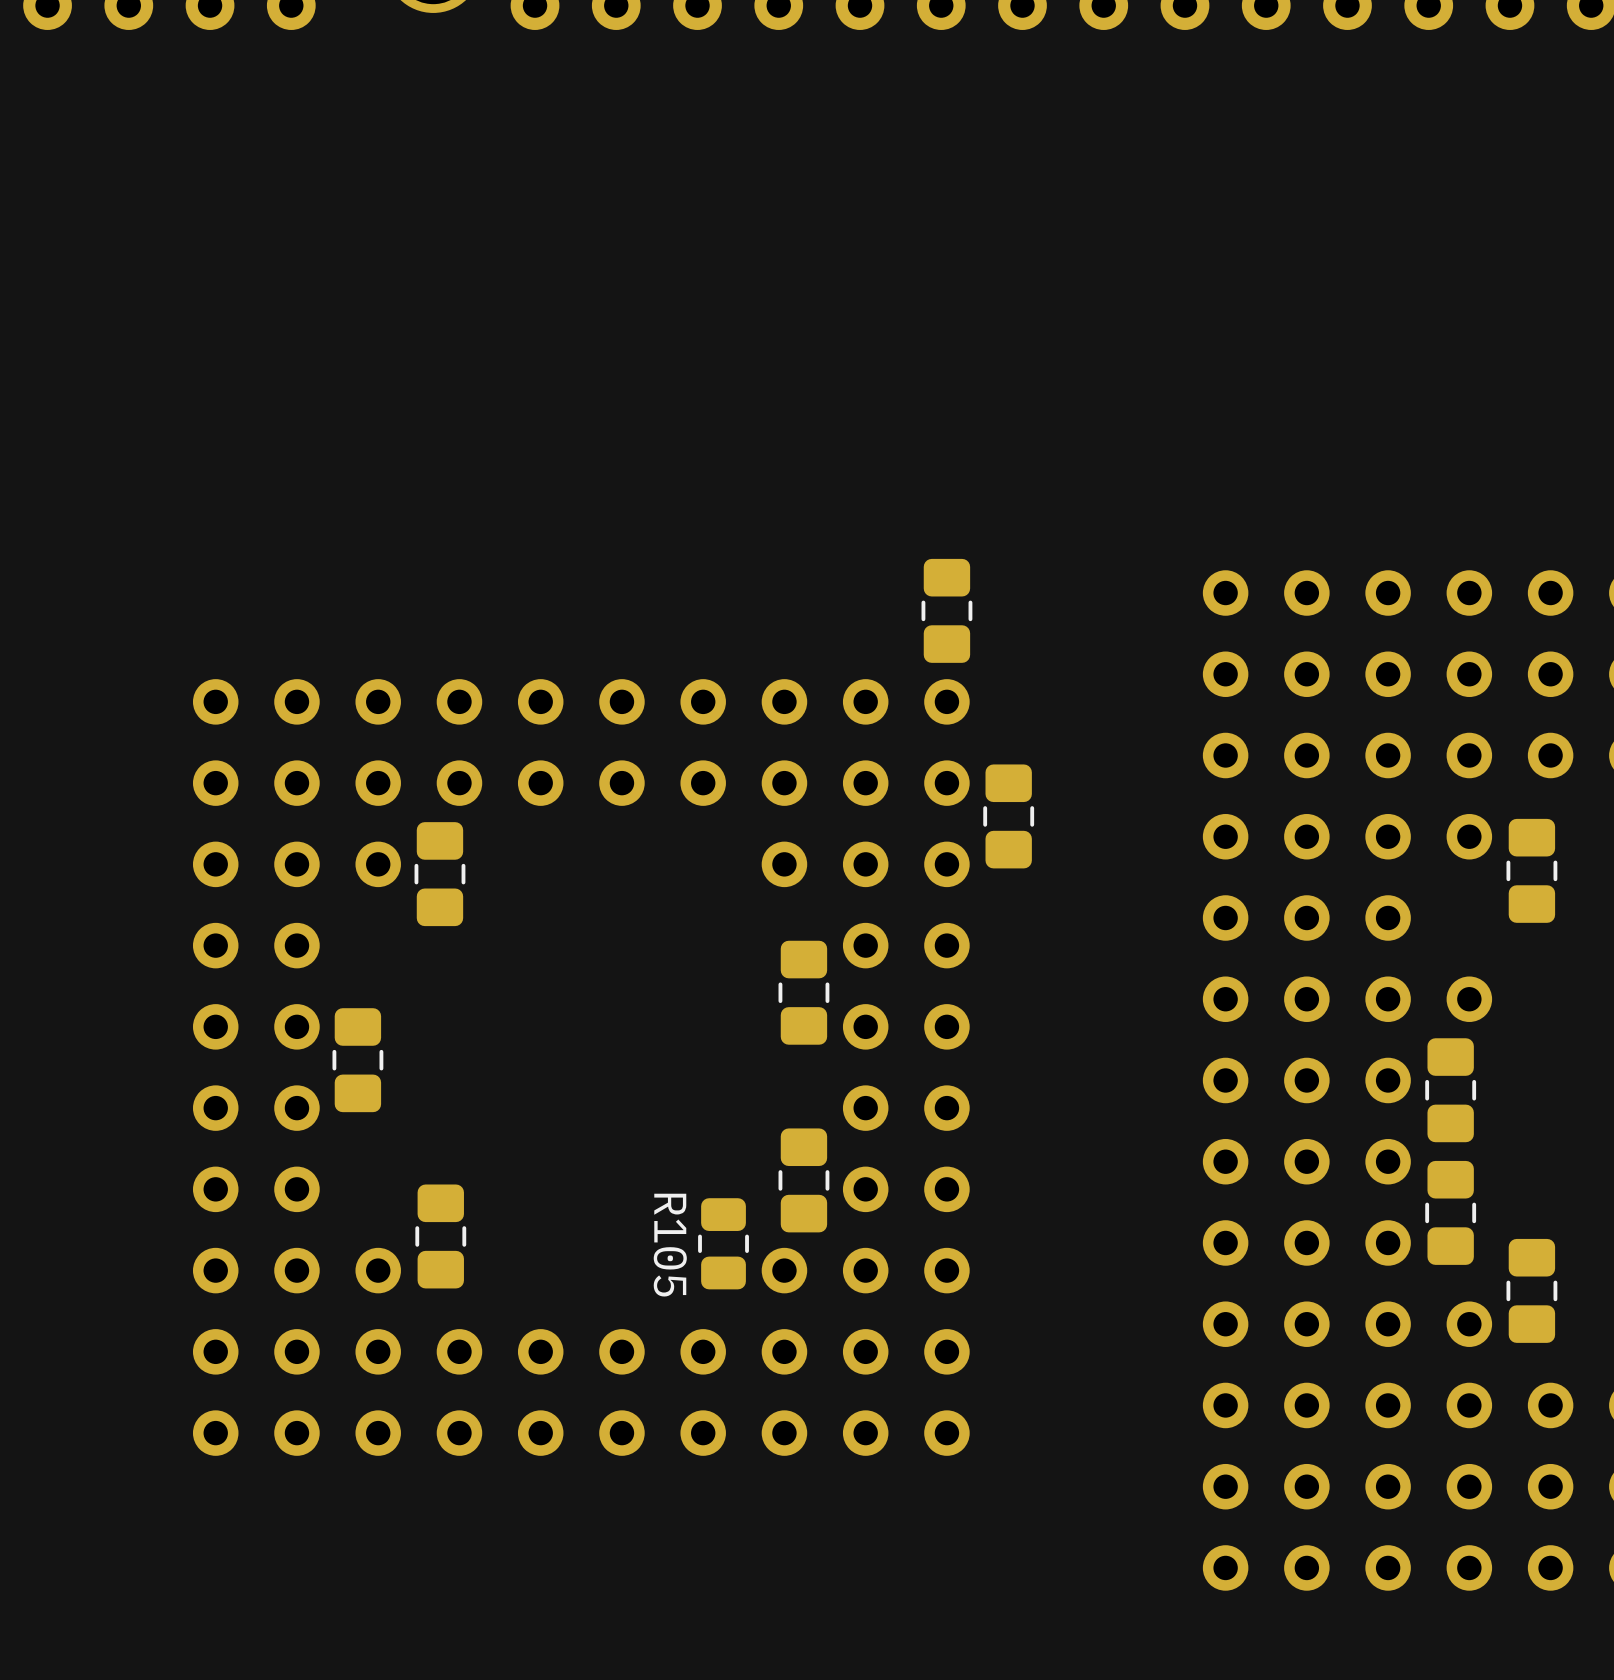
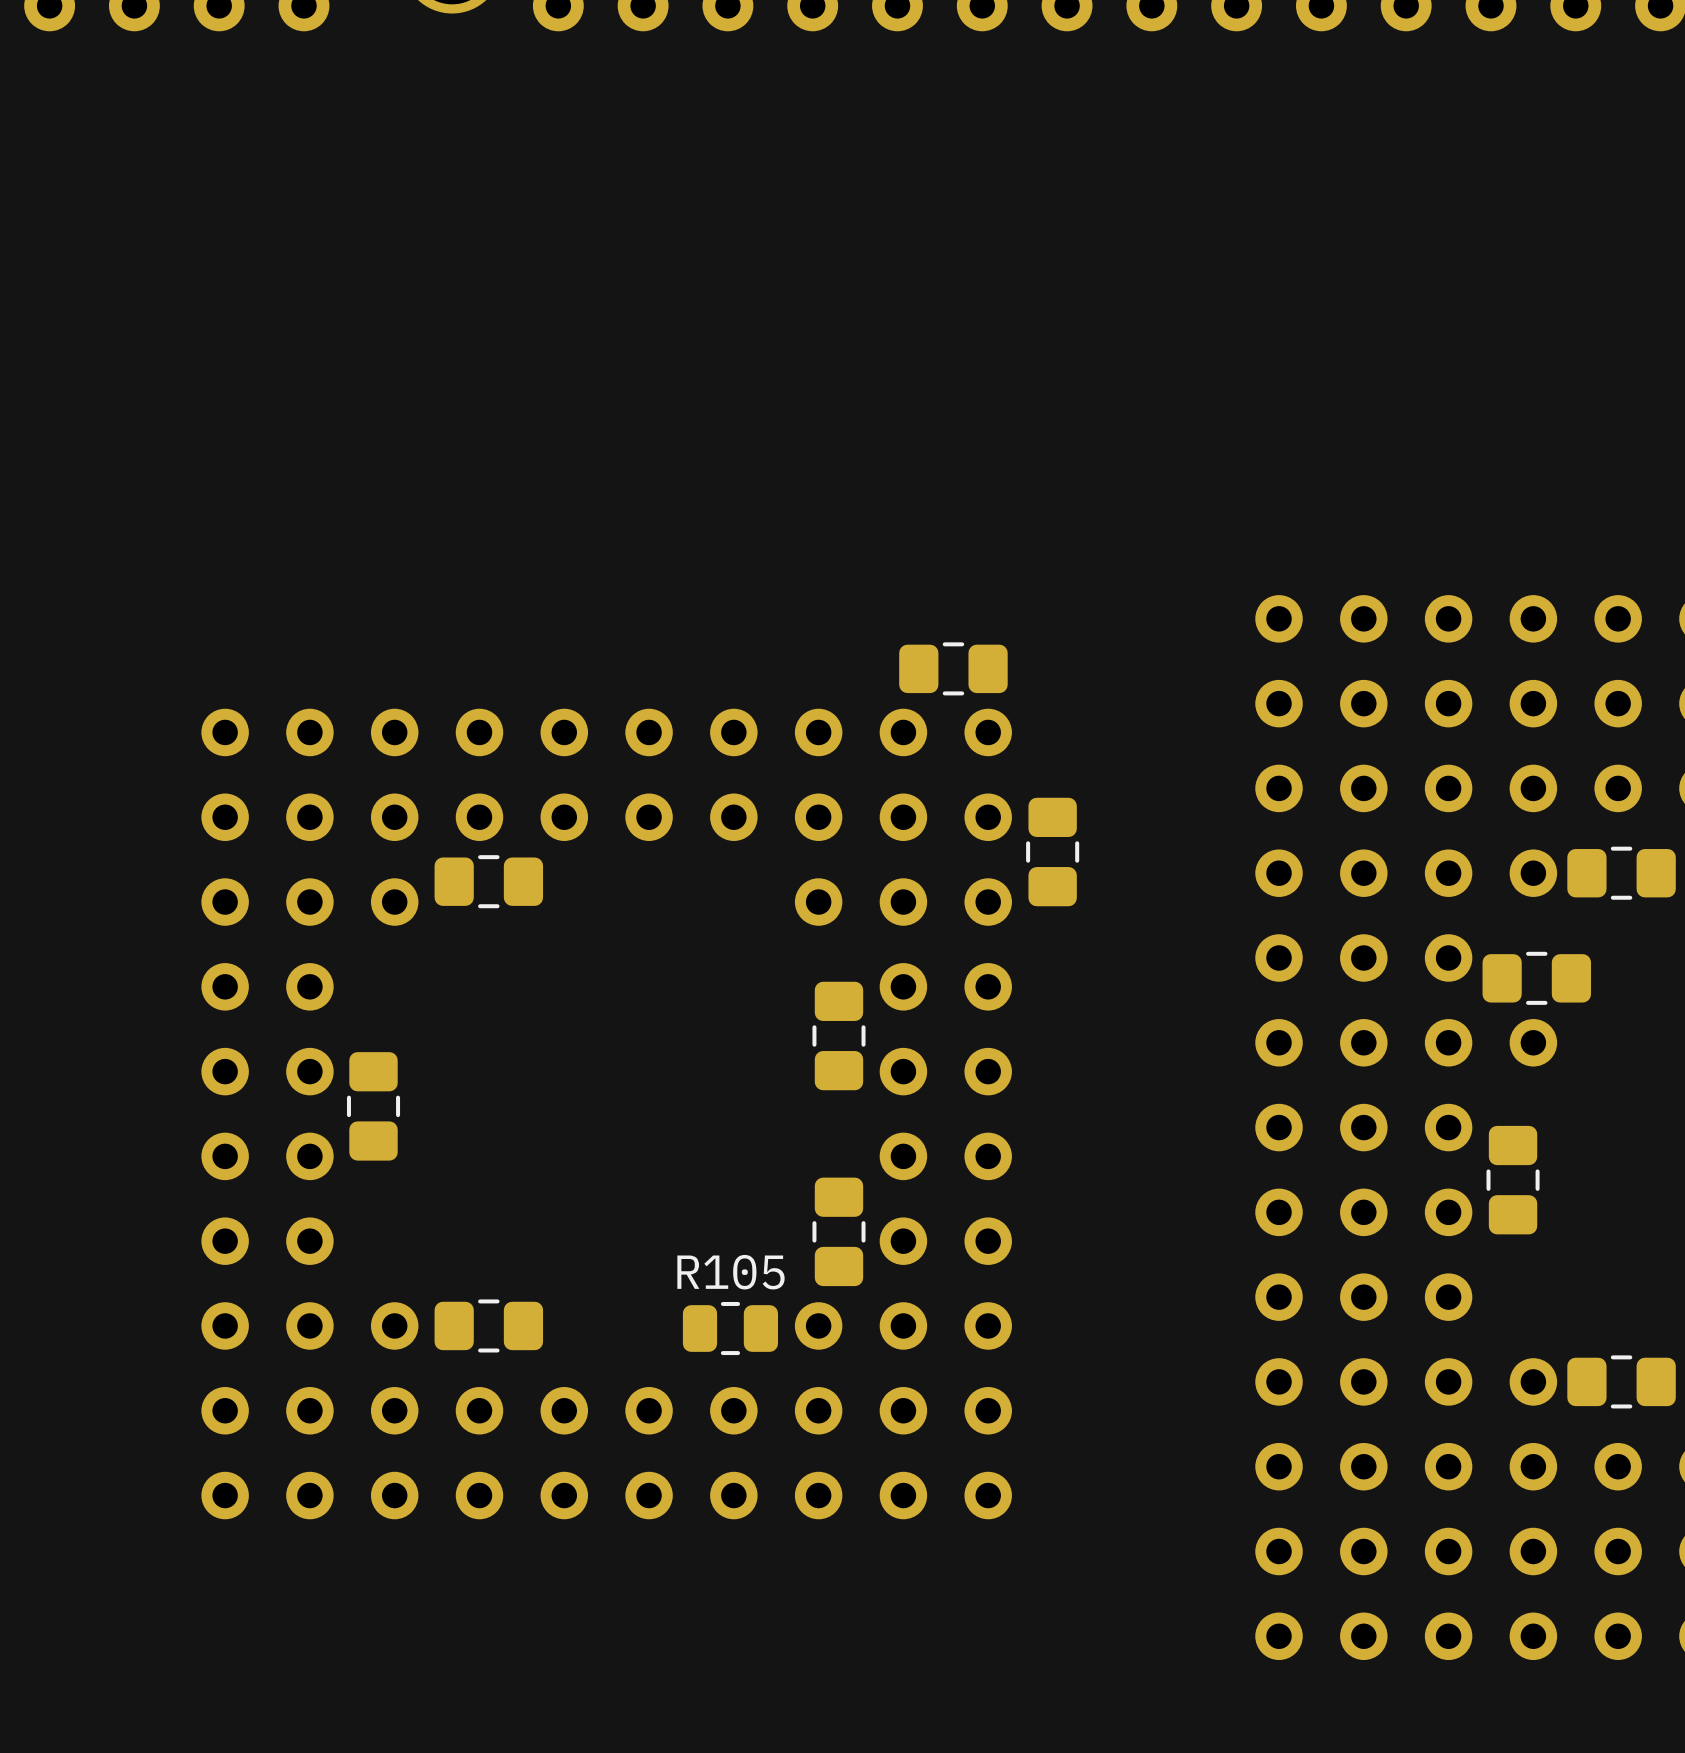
part rotation: 0° (946, 610) -> 90° clockwise (953, 668)
part rotation: 0° (1531, 870) -> 90° clockwise (1621, 873)
part rotation: 0° (439, 874) -> 90° clockwise (488, 881)
part: none -> (1536, 978)
part position: (1450, 1090) -> (1513, 1180)
part: (1450, 1212) -> none
part rotation: 0° (440, 1236) -> 90° clockwise (488, 1325)
R105 rotation: 0° (723, 1243) -> 90° clockwise (730, 1328)
part rotation: 0° (1531, 1290) -> 90° clockwise (1621, 1381)

